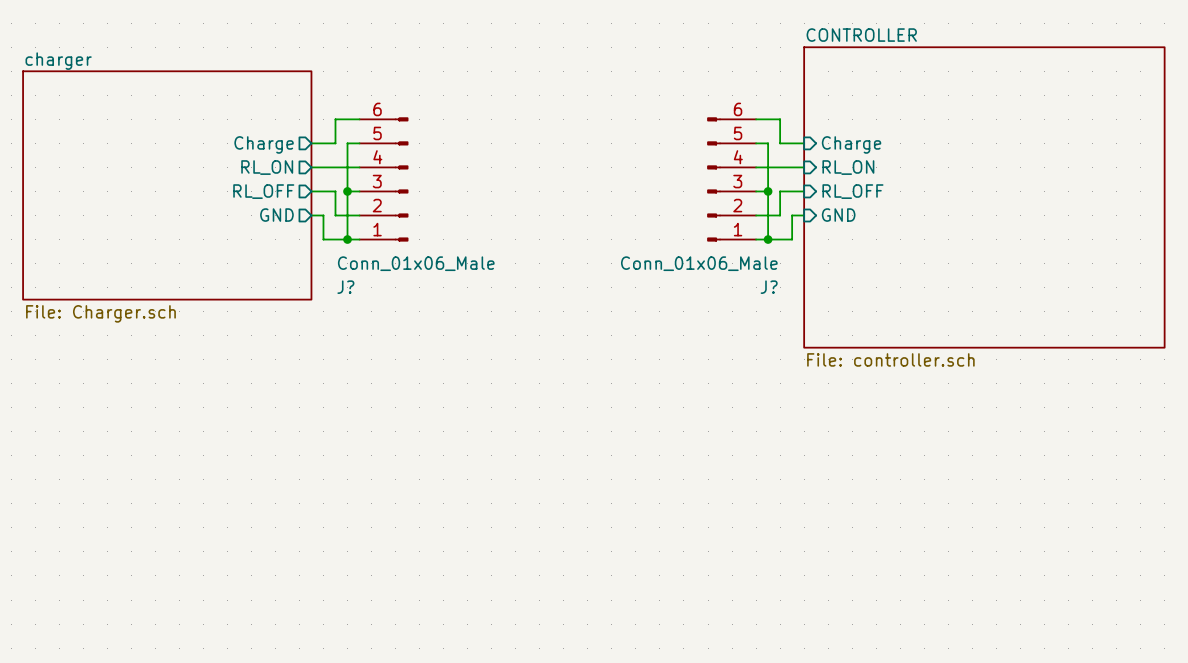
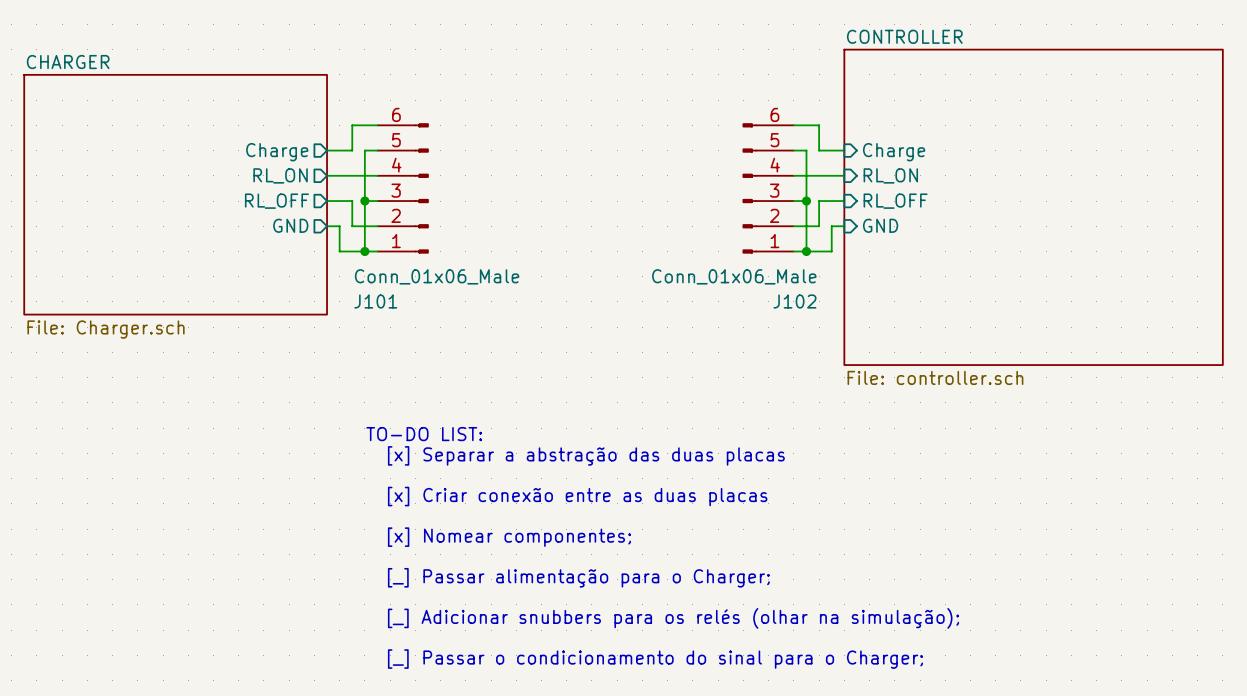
sheet charger name: charger (58, 61) -> CHARGER (68, 62)
J? name: J? (345, 287) -> J101 (375, 301)
J? name: J? (769, 287) -> J102 (794, 301)
text: none -> TO-DO LIST: (424, 434)
text: none -> [x] Separar a abstração das duas placas (586, 455)
text: none -> [x] Criar conexão entre as duas placas (577, 496)
text: none -> [x] Nomear componentes; (509, 537)
text: none -> [_] Passar alimentação para o Charger; (578, 577)
text: none -> [_] Adicionar snubbers para os relés (olhar na simulação); (673, 618)
text: none -> [_] Passar o condicionamento do sinal para o Charger; (655, 659)

